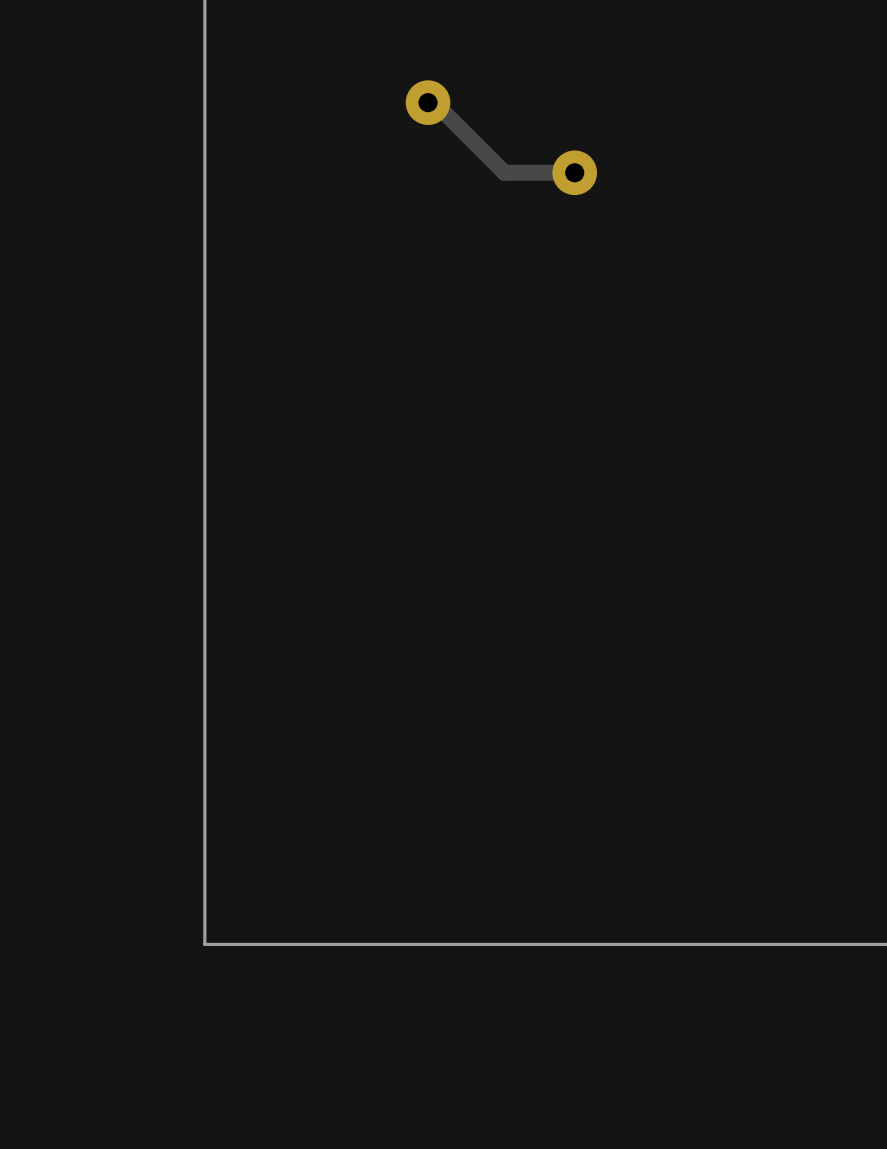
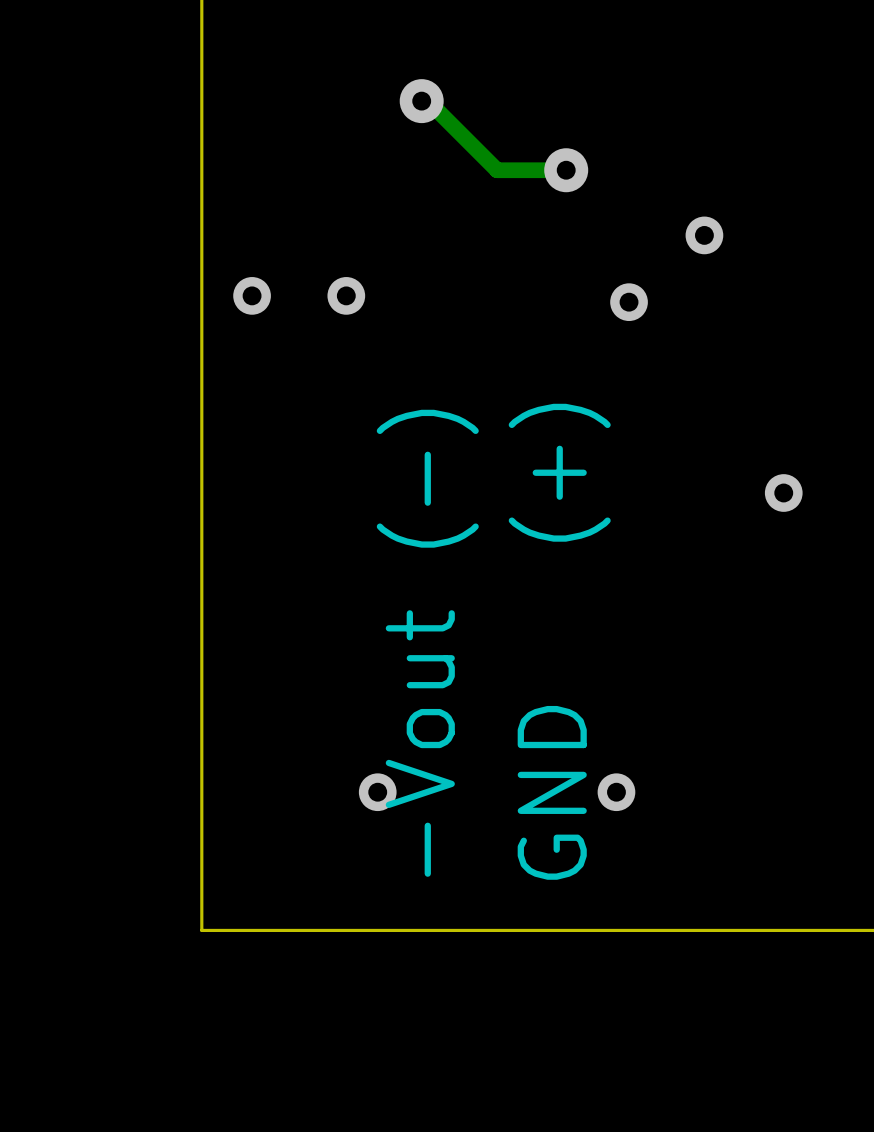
via: none -> (704, 235)
via: none -> (252, 295)
via: none -> (346, 295)
via: none -> (629, 302)
via: none -> (783, 493)
text: none -> GND (+) (559, 641)
text: none -> -Vout (-) (427, 643)
via: none -> (377, 792)
via: none -> (616, 792)

